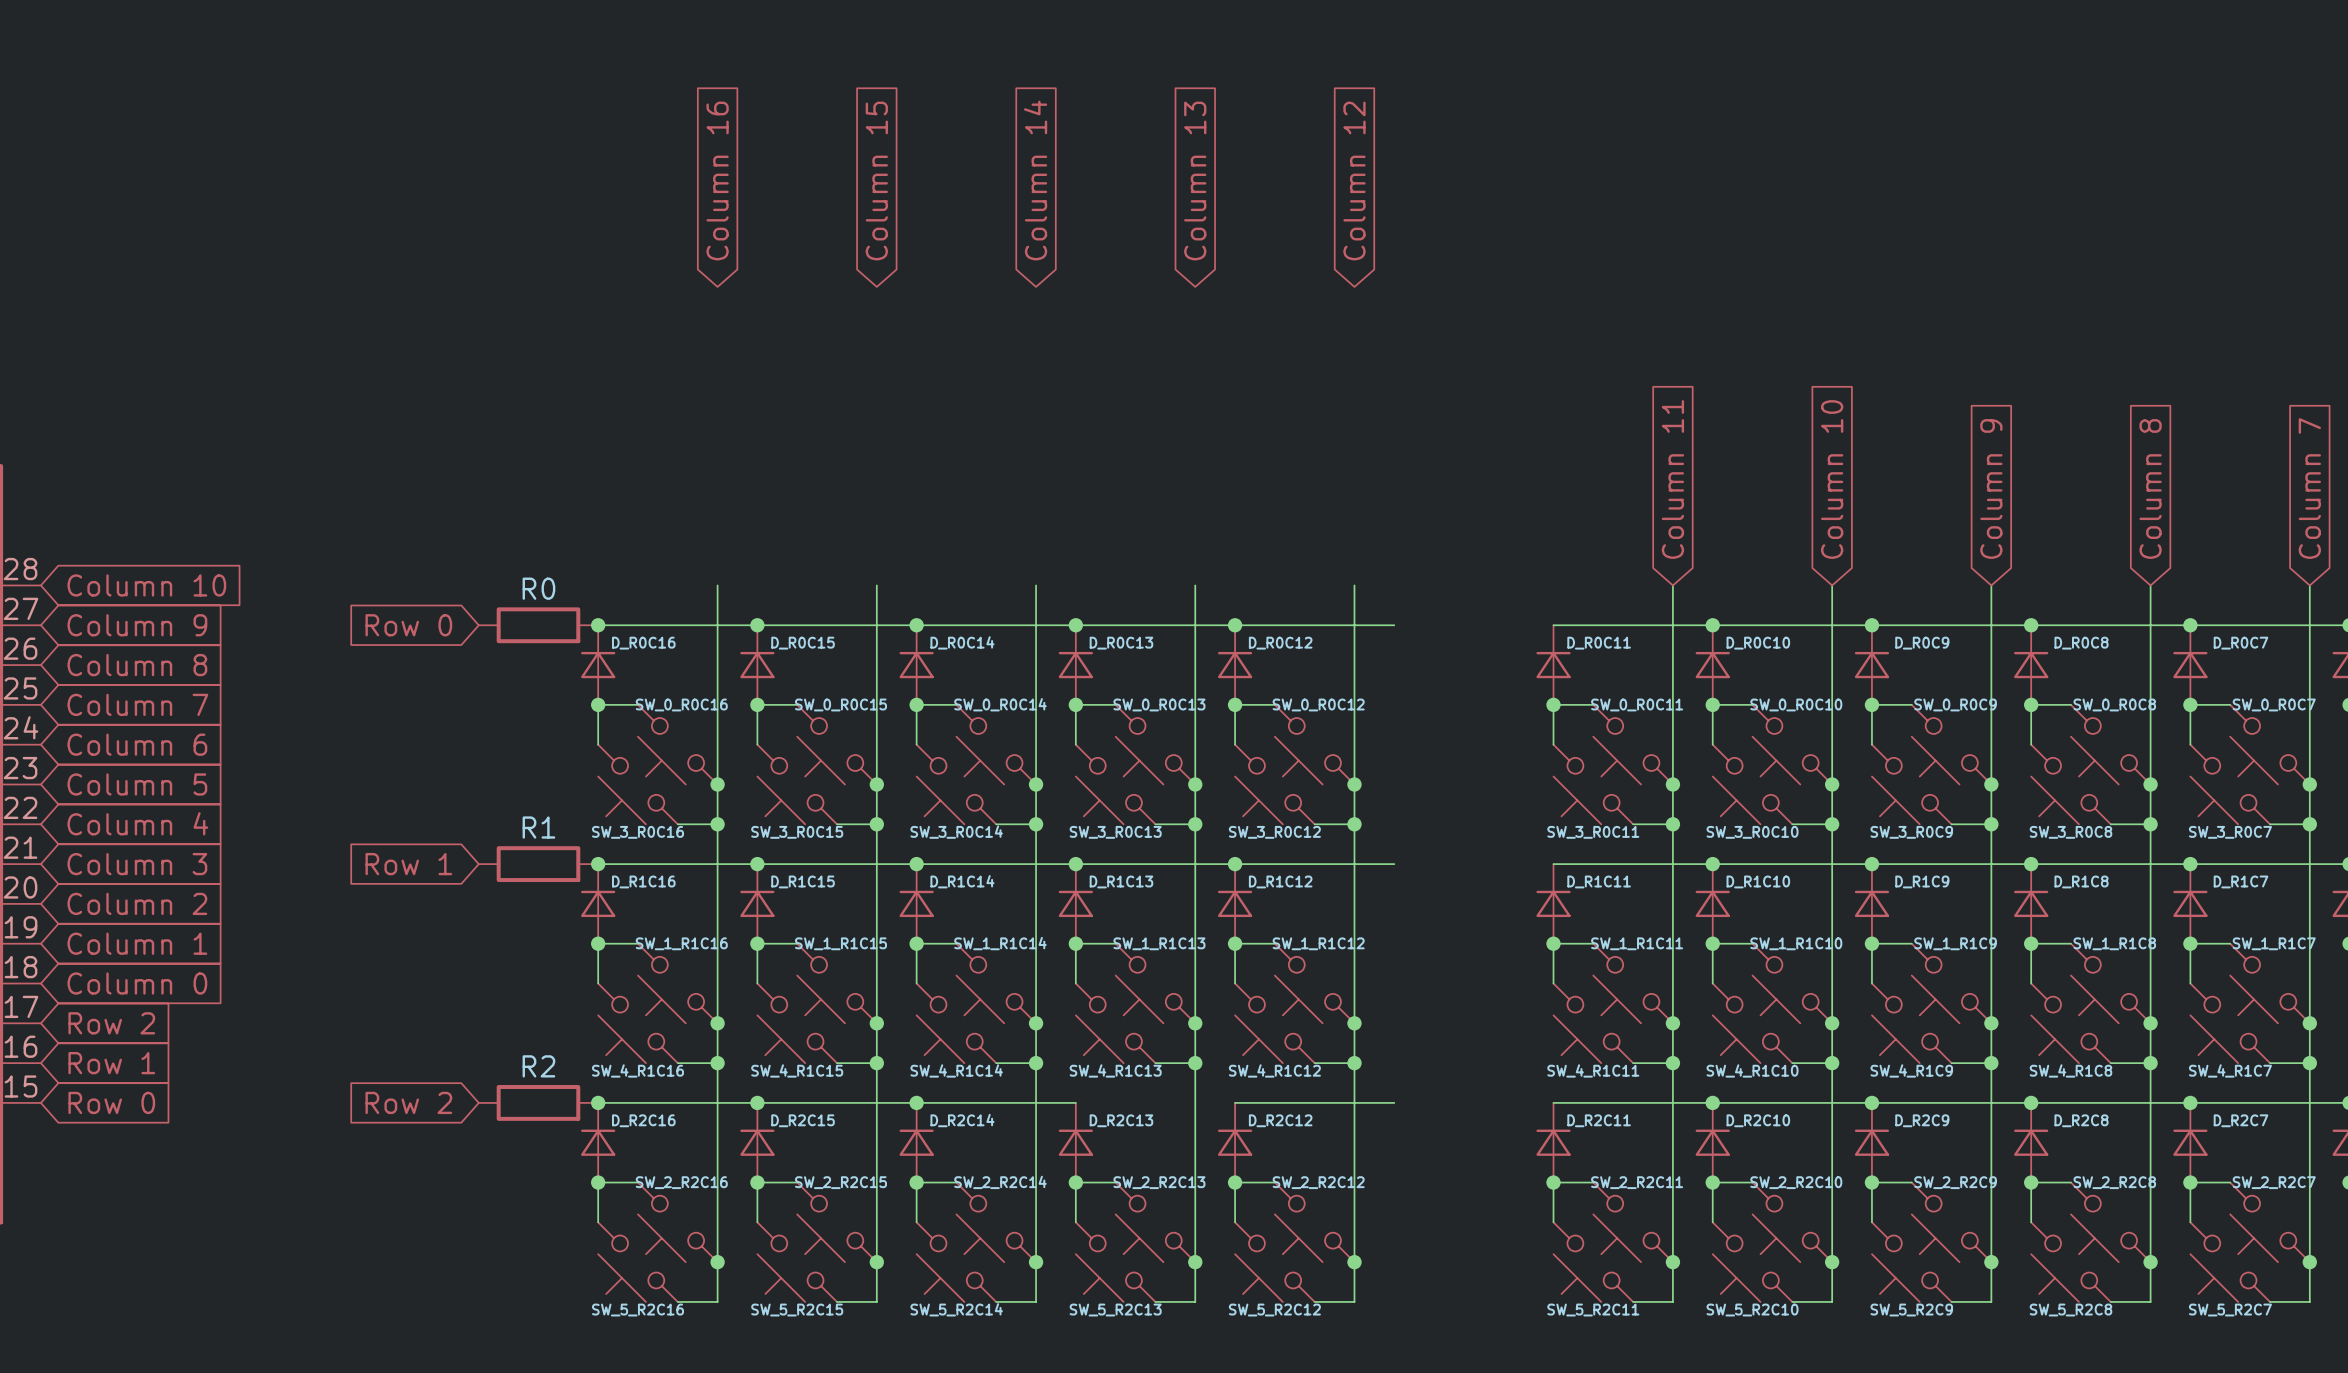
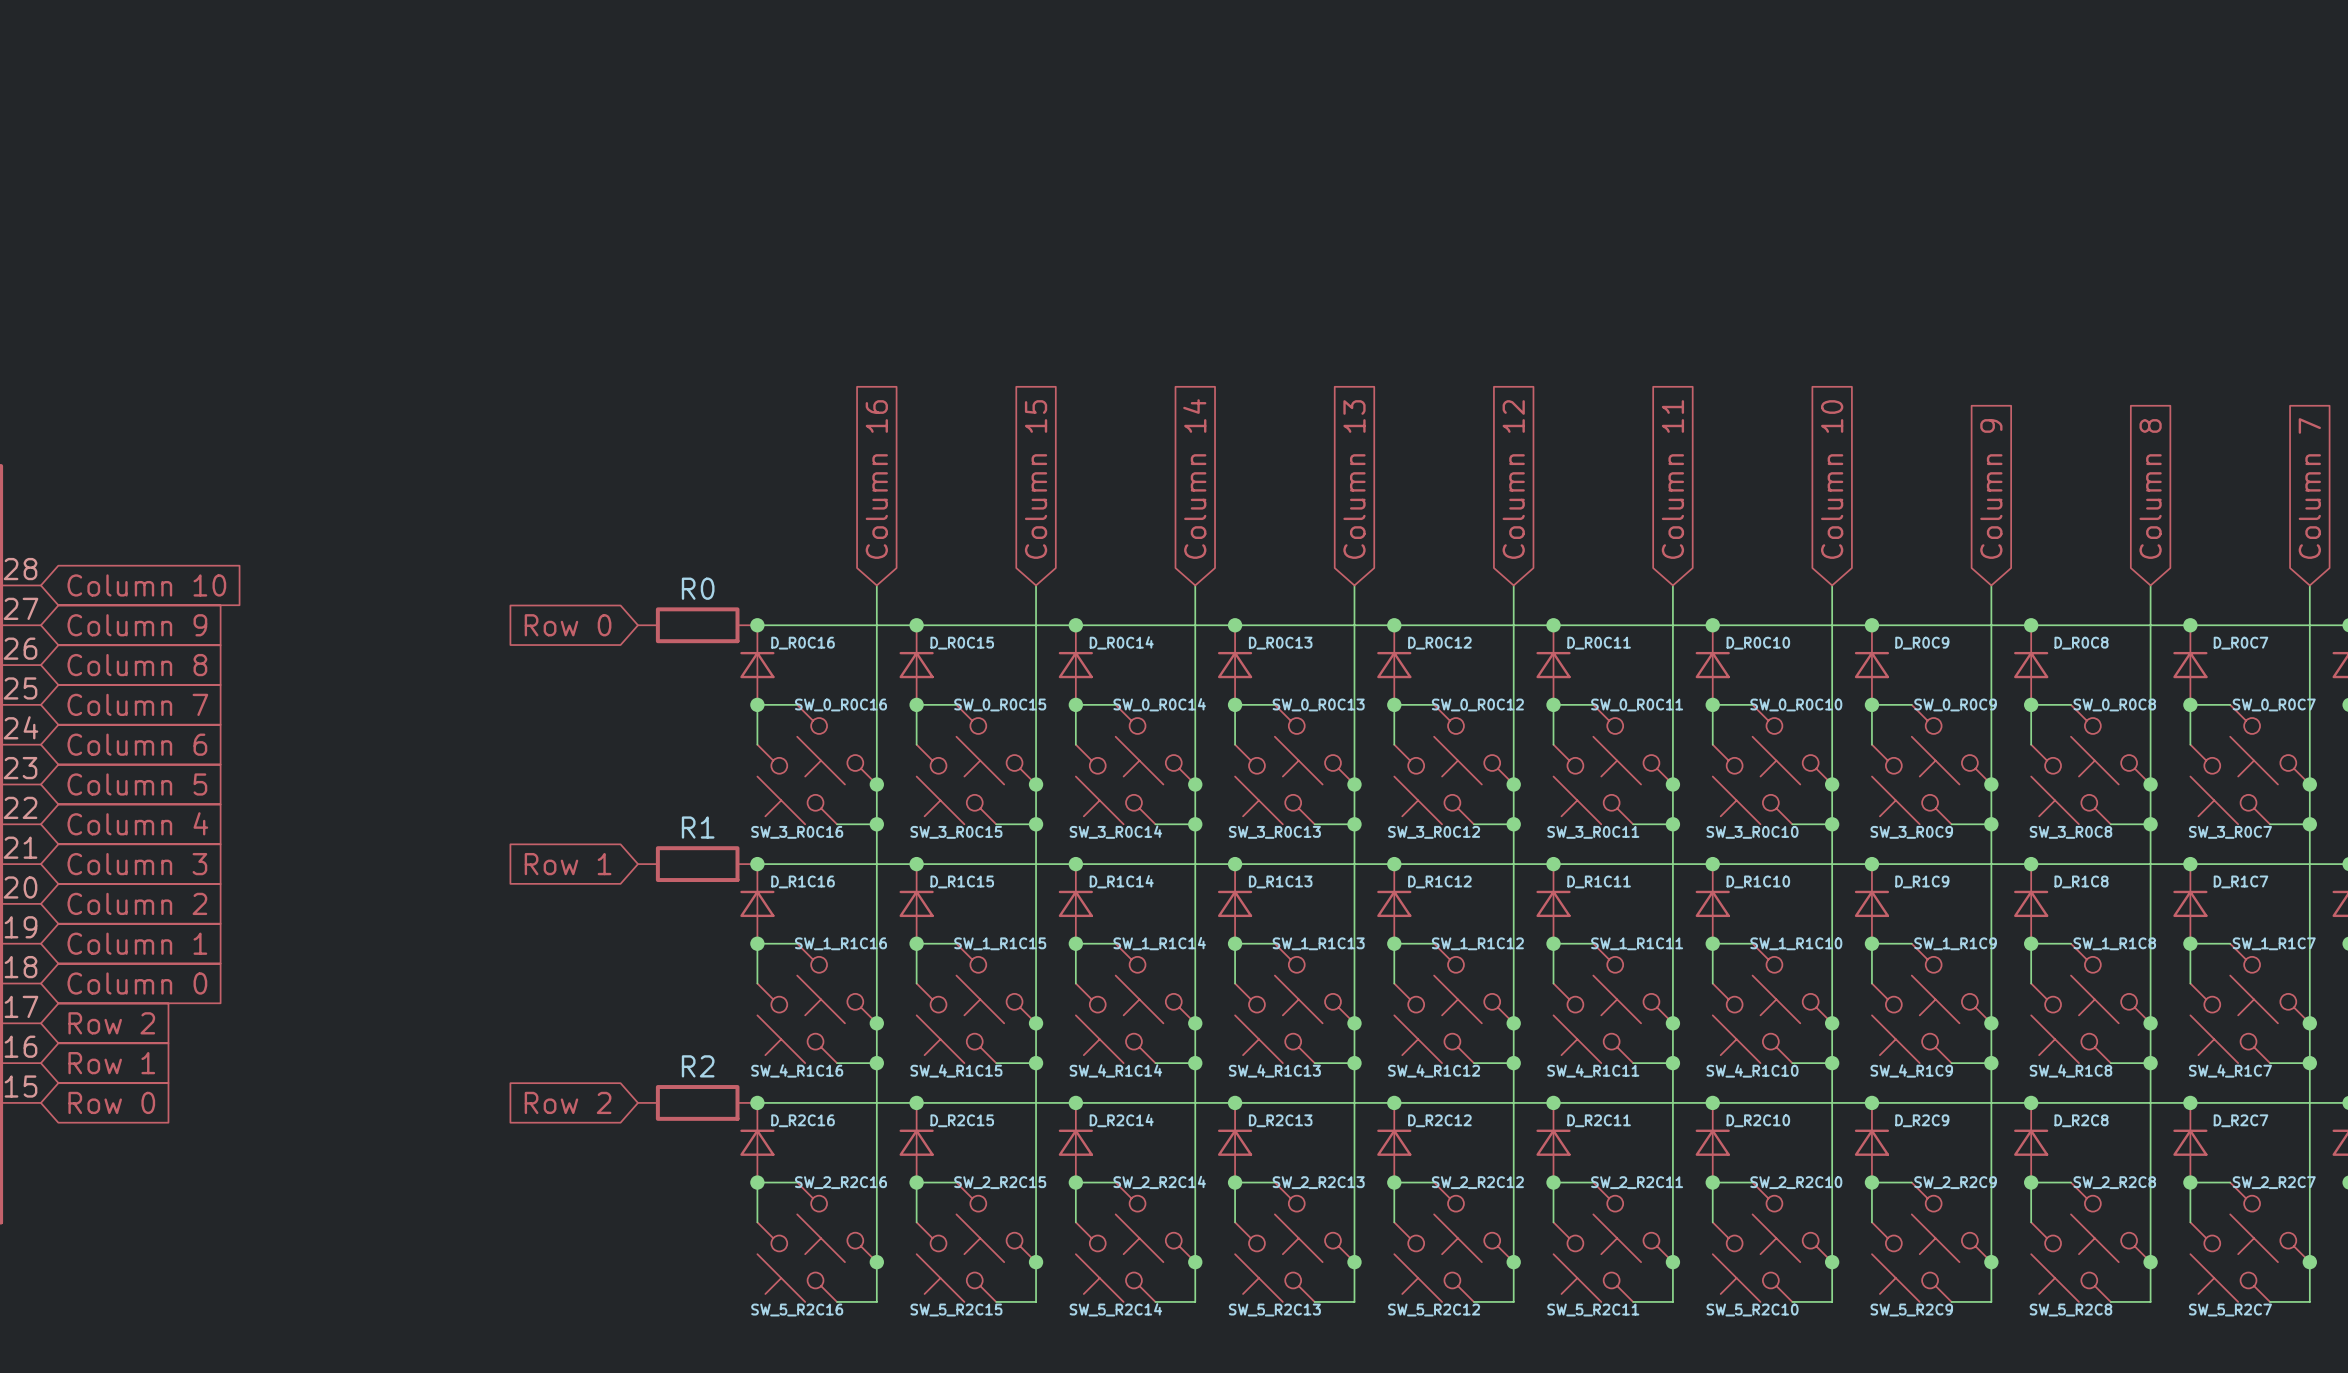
global label position: Column 16 (717, 180) -> Column 16 (876, 479)
global label position: Column 15 (876, 180) -> Column 15 (1036, 479)
global label position: Column 14 (1035, 180) -> Column 14 (1194, 479)
global label position: Column 13 (1195, 180) -> Column 13 (1354, 479)
global label position: Column 12 (1354, 180) -> Column 12 (1513, 479)
wire: (717, 585) (717, 1301) (677, 1301) -> none
wire: none -> (1513, 585) (1513, 1301) (1473, 1301)
global label position: Row 0 (408, 625) -> Row 0 (568, 625)
R0 position: (538, 625) -> (697, 625)
wire: (598, 625) (757, 625) -> none
junction: (598, 625) -> none
wire: none -> (1394, 625) (1553, 625)
junction: none -> (1394, 625)
junction: none -> (1553, 625)
D_R0C14 name: D_R0C14 (962, 642) -> D_R0C15 (962, 643)
D_R0C15 name: D_R0C15 (803, 643) -> D_R0C16 (803, 643)
D_R0C13 name: D_R0C13 (1121, 643) -> D_R0C14 (1121, 642)
D_R0C12 name: D_R0C12 (1280, 643) -> D_R0C13 (1280, 643)
D_R0C16: (598, 665) -> none
D_R0C12: none -> (1394, 665)
junction: (598, 704) -> none
wire: (637, 704) (598, 704) (598, 744) -> none
SW_0_R0C15 name: SW_0_R0C15 (840, 704) -> SW_0_R0C16 (840, 704)
SW_0_R0C14 name: SW_0_R0C14 (1000, 704) -> SW_0_R0C15 (1000, 704)
SW_0_R0C13 name: SW_0_R0C13 (1159, 704) -> SW_0_R0C14 (1159, 704)
SW_0_R0C12 name: SW_0_R0C12 (1318, 704) -> SW_0_R0C13 (1318, 704)
junction: none -> (1394, 704)
wire: none -> (1434, 704) (1394, 704) (1394, 744)
SW_0_R0C16: (677, 744) -> none
SW_0_R0C12: none -> (1473, 744)
SW_3_R0C16: (637, 784) -> none
junction: (717, 784) -> none
SW_3_R0C12: none -> (1434, 784)
junction: none -> (1513, 784)
wire: (677, 824) (717, 824) -> none
junction: (717, 824) -> none
wire: none -> (1473, 824) (1513, 824)
junction: none -> (1513, 824)
SW_3_R0C15 name: SW_3_R0C15 (797, 832) -> SW_3_R0C16 (797, 832)
SW_3_R0C14 name: SW_3_R0C14 (956, 832) -> SW_3_R0C15 (956, 832)
SW_3_R0C13 name: SW_3_R0C13 (1115, 832) -> SW_3_R0C14 (1115, 832)
SW_3_R0C12 name: SW_3_R0C12 (1274, 832) -> SW_3_R0C13 (1274, 832)
global label position: Row 1 (408, 864) -> Row 1 (568, 864)
R1 position: (538, 864) -> (697, 864)
wire: (598, 864) (757, 864) -> none
junction: (598, 864) -> none
wire: none -> (1394, 864) (1553, 864)
junction: none -> (1394, 864)
junction: none -> (1553, 864)
D_R1C15 name: D_R1C15 (803, 881) -> D_R1C16 (803, 881)
D_R1C14 name: D_R1C14 (962, 881) -> D_R1C15 (962, 881)
D_R1C13 name: D_R1C13 (1121, 881) -> D_R1C14 (1121, 881)
D_R1C12 name: D_R1C12 (1280, 881) -> D_R1C13 (1280, 881)
D_R1C16: (598, 903) -> none
D_R1C12: none -> (1394, 903)
junction: (598, 943) -> none
wire: (637, 943) (598, 943) (598, 983) -> none
SW_1_R1C15 name: SW_1_R1C15 (840, 943) -> SW_1_R1C16 (840, 943)
SW_1_R1C14 name: SW_1_R1C14 (1000, 943) -> SW_1_R1C15 (1000, 943)
SW_1_R1C13 name: SW_1_R1C13 (1159, 943) -> SW_1_R1C14 (1159, 943)
SW_1_R1C12 name: SW_1_R1C12 (1318, 943) -> SW_1_R1C13 (1318, 943)
junction: none -> (1394, 943)
wire: none -> (1434, 943) (1394, 943) (1394, 983)
SW_1_R1C16: (677, 983) -> none
SW_1_R1C12: none -> (1473, 983)
SW_4_R1C16: (637, 1023) -> none
junction: (717, 1023) -> none
SW_4_R1C12: none -> (1434, 1023)
junction: none -> (1513, 1023)
wire: (677, 1063) (717, 1063) -> none
junction: (717, 1063) -> none
wire: none -> (1473, 1063) (1513, 1063)
junction: none -> (1513, 1063)
SW_4_R1C15 name: SW_4_R1C15 (797, 1070) -> SW_4_R1C16 (797, 1070)
SW_4_R1C14 name: SW_4_R1C14 (956, 1070) -> SW_4_R1C15 (956, 1070)
SW_4_R1C13 name: SW_4_R1C13 (1115, 1070) -> SW_4_R1C14 (1115, 1070)
SW_4_R1C12 name: SW_4_R1C12 (1274, 1070) -> SW_4_R1C13 (1274, 1070)
global label position: Row 2 (408, 1102) -> Row 2 (568, 1102)
R2 position: (538, 1102) -> (697, 1102)
wire: (598, 1102) (757, 1102) -> none
junction: (598, 1102) -> none
wire: none -> (1075, 1102) (1235, 1102)
junction: none -> (1075, 1102)
junction: none -> (1235, 1102)
wire: none -> (1394, 1102) (1553, 1102)
junction: none -> (1394, 1102)
junction: none -> (1553, 1102)
D_R2C15 name: D_R2C15 (803, 1120) -> D_R2C16 (803, 1120)
D_R2C14 name: D_R2C14 (962, 1120) -> D_R2C15 (962, 1120)
D_R2C13 name: D_R2C13 (1121, 1120) -> D_R2C14 (1121, 1120)
D_R2C12 name: D_R2C12 (1280, 1120) -> D_R2C13 (1280, 1120)
D_R2C16: (598, 1142) -> none
D_R2C12: none -> (1394, 1142)
junction: (598, 1182) -> none
wire: (637, 1182) (598, 1182) (598, 1222) -> none
SW_2_R2C15 name: SW_2_R2C15 (840, 1182) -> SW_2_R2C16 (840, 1182)
SW_2_R2C14 name: SW_2_R2C14 (1000, 1182) -> SW_2_R2C15 (1000, 1182)
SW_2_R2C13 name: SW_2_R2C13 (1159, 1182) -> SW_2_R2C14 (1159, 1182)
SW_2_R2C12 name: SW_2_R2C12 (1318, 1182) -> SW_2_R2C13 (1318, 1182)
junction: none -> (1394, 1182)
wire: none -> (1434, 1182) (1394, 1182) (1394, 1222)
SW_2_R2C16: (677, 1222) -> none
SW_2_R2C12: none -> (1473, 1222)
SW_5_R2C16: (637, 1262) -> none
junction: (717, 1262) -> none
SW_5_R2C12: none -> (1434, 1262)
junction: none -> (1513, 1262)
SW_5_R2C14 name: SW_5_R2C14 (956, 1309) -> SW_5_R2C15 (956, 1310)
SW_5_R2C15 name: SW_5_R2C15 (797, 1310) -> SW_5_R2C16 (797, 1310)
SW_5_R2C13 name: SW_5_R2C13 (1115, 1310) -> SW_5_R2C14 (1115, 1309)
SW_5_R2C12 name: SW_5_R2C12 (1274, 1310) -> SW_5_R2C13 (1274, 1310)

